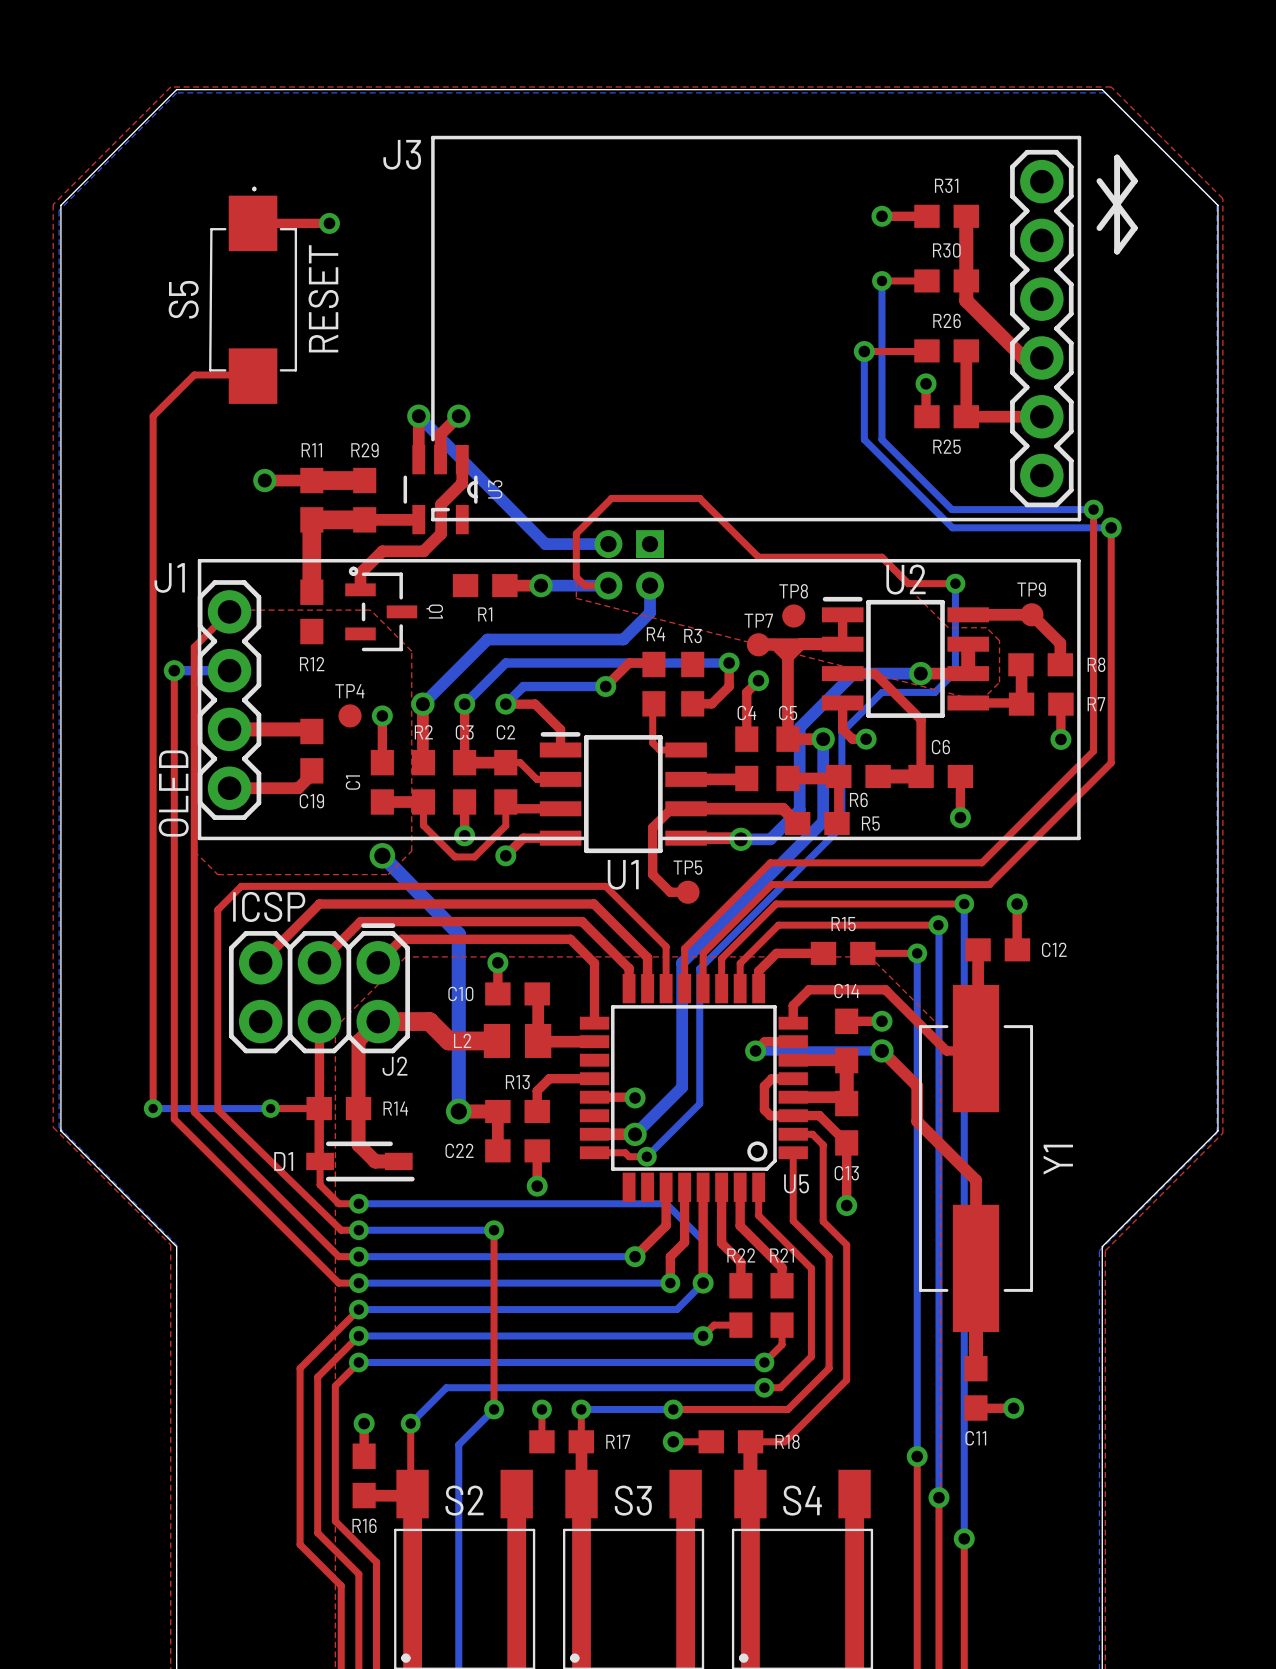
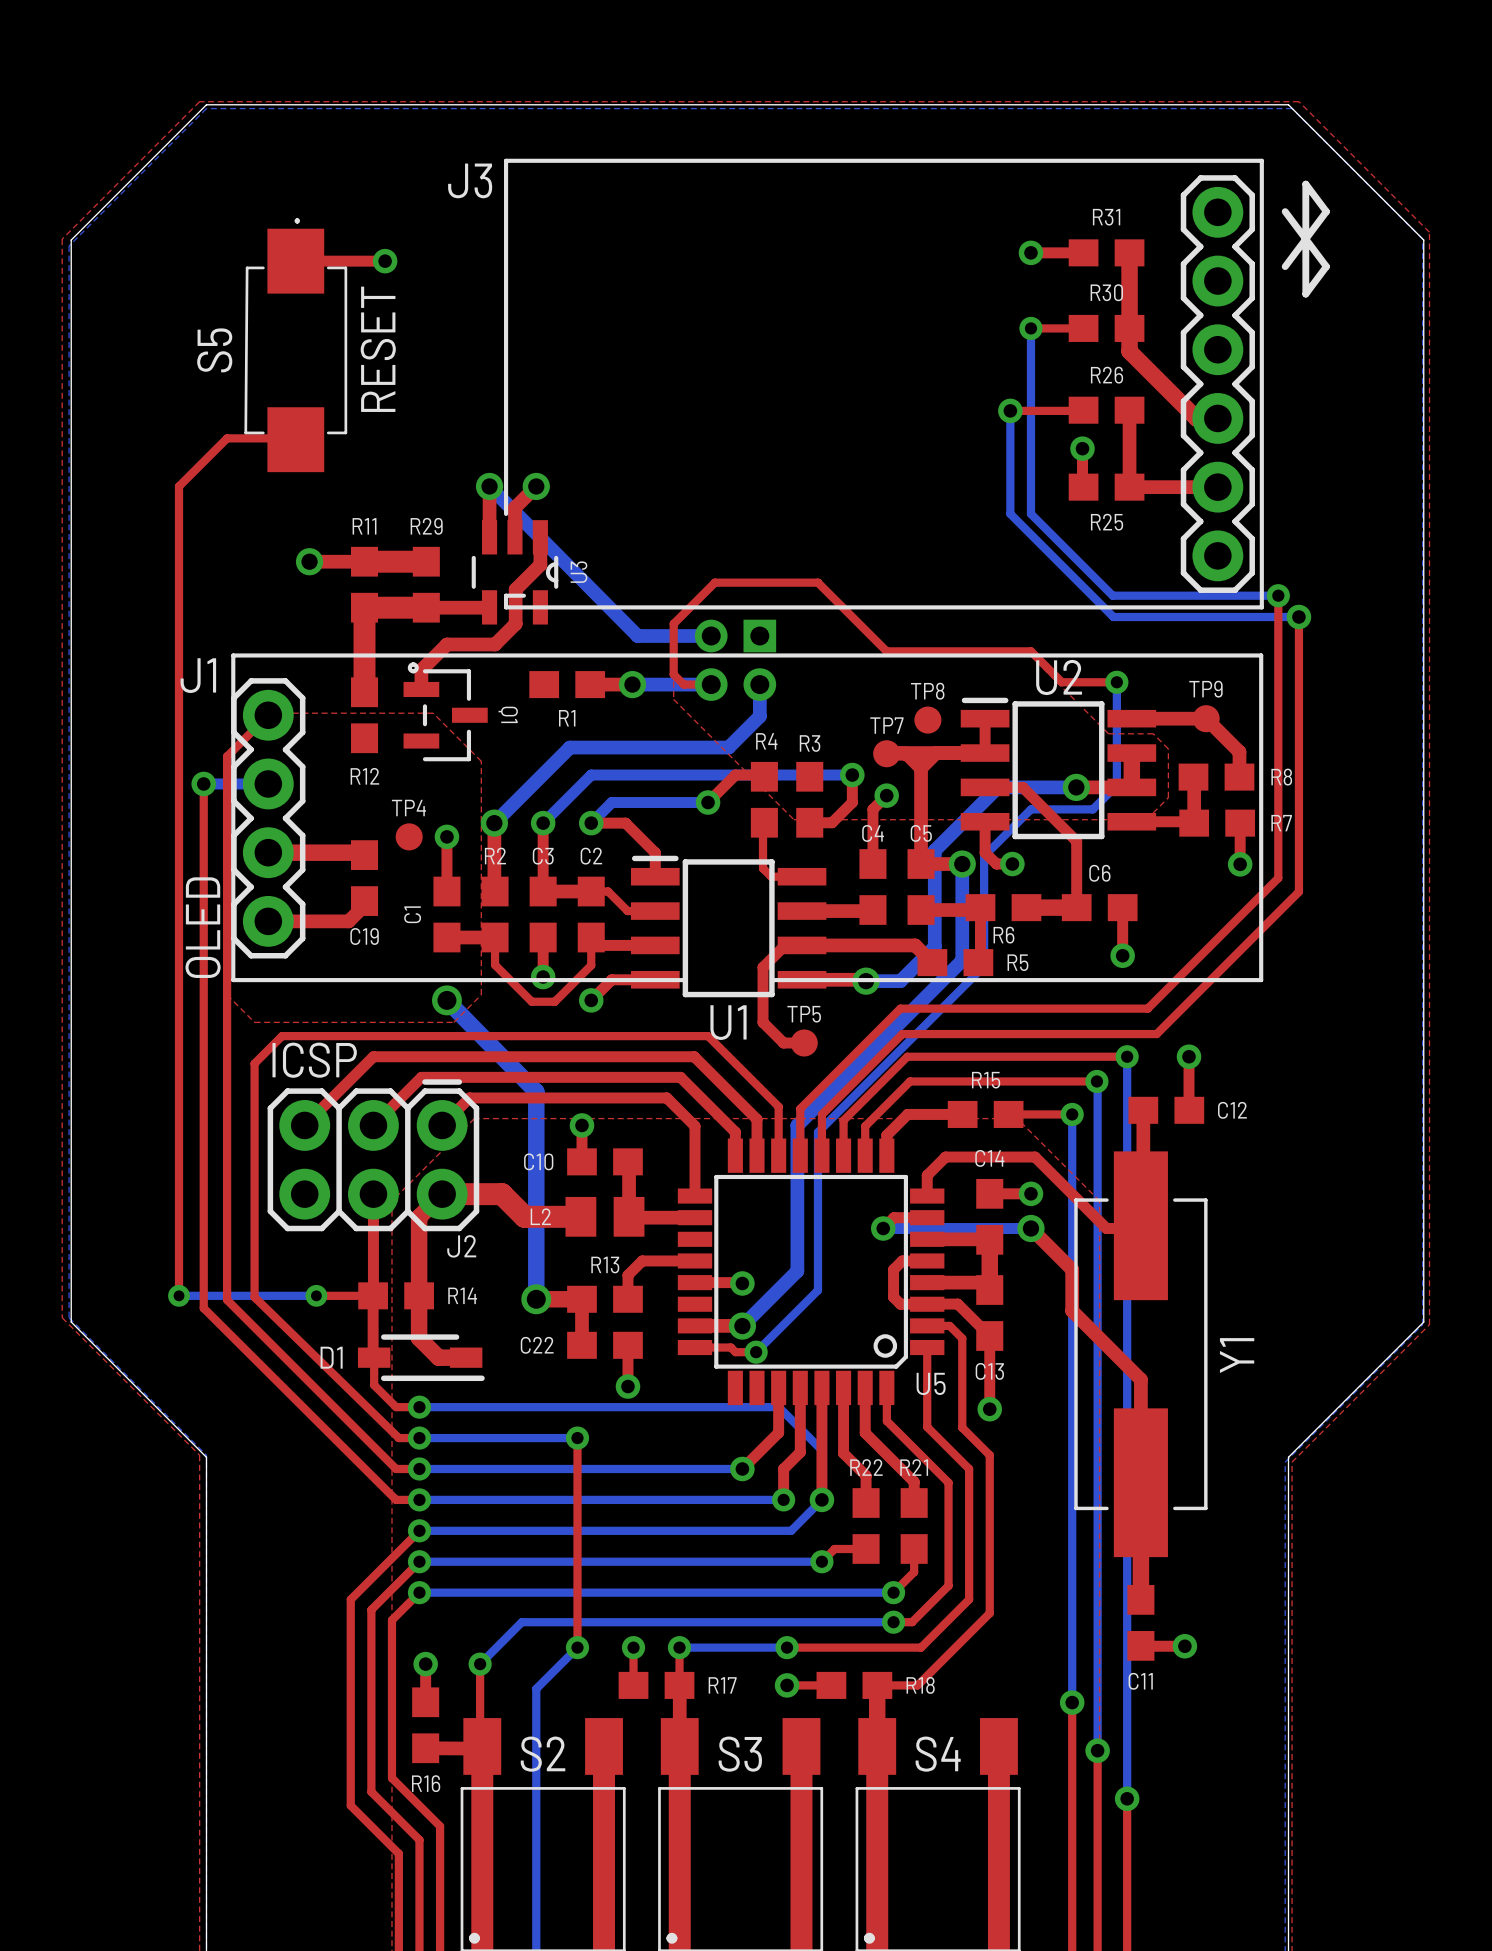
top zone outline: (576, 598) (980, 701) -> (673, 699) (793, 819) (1146, 819)

